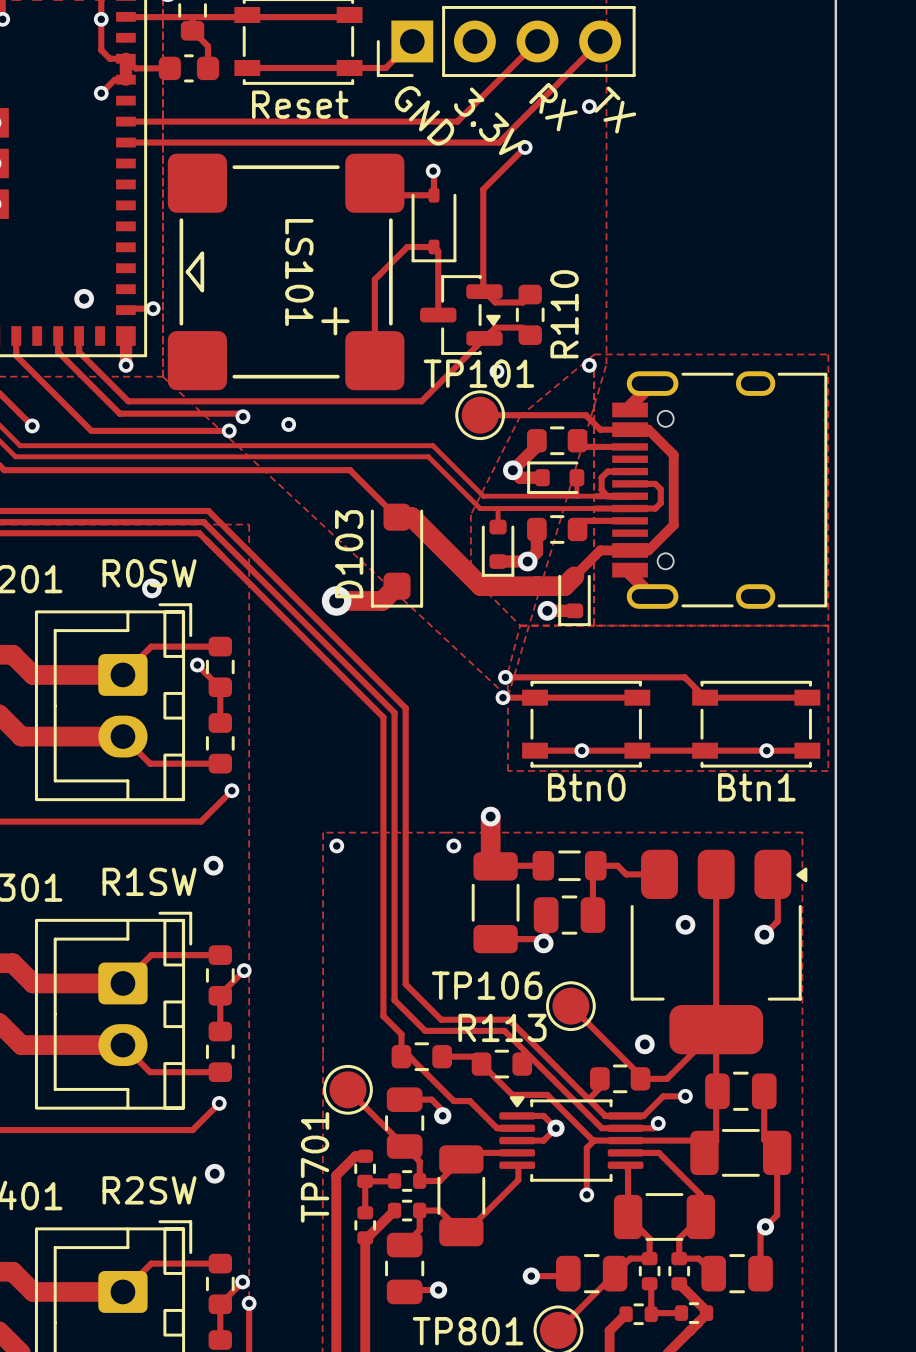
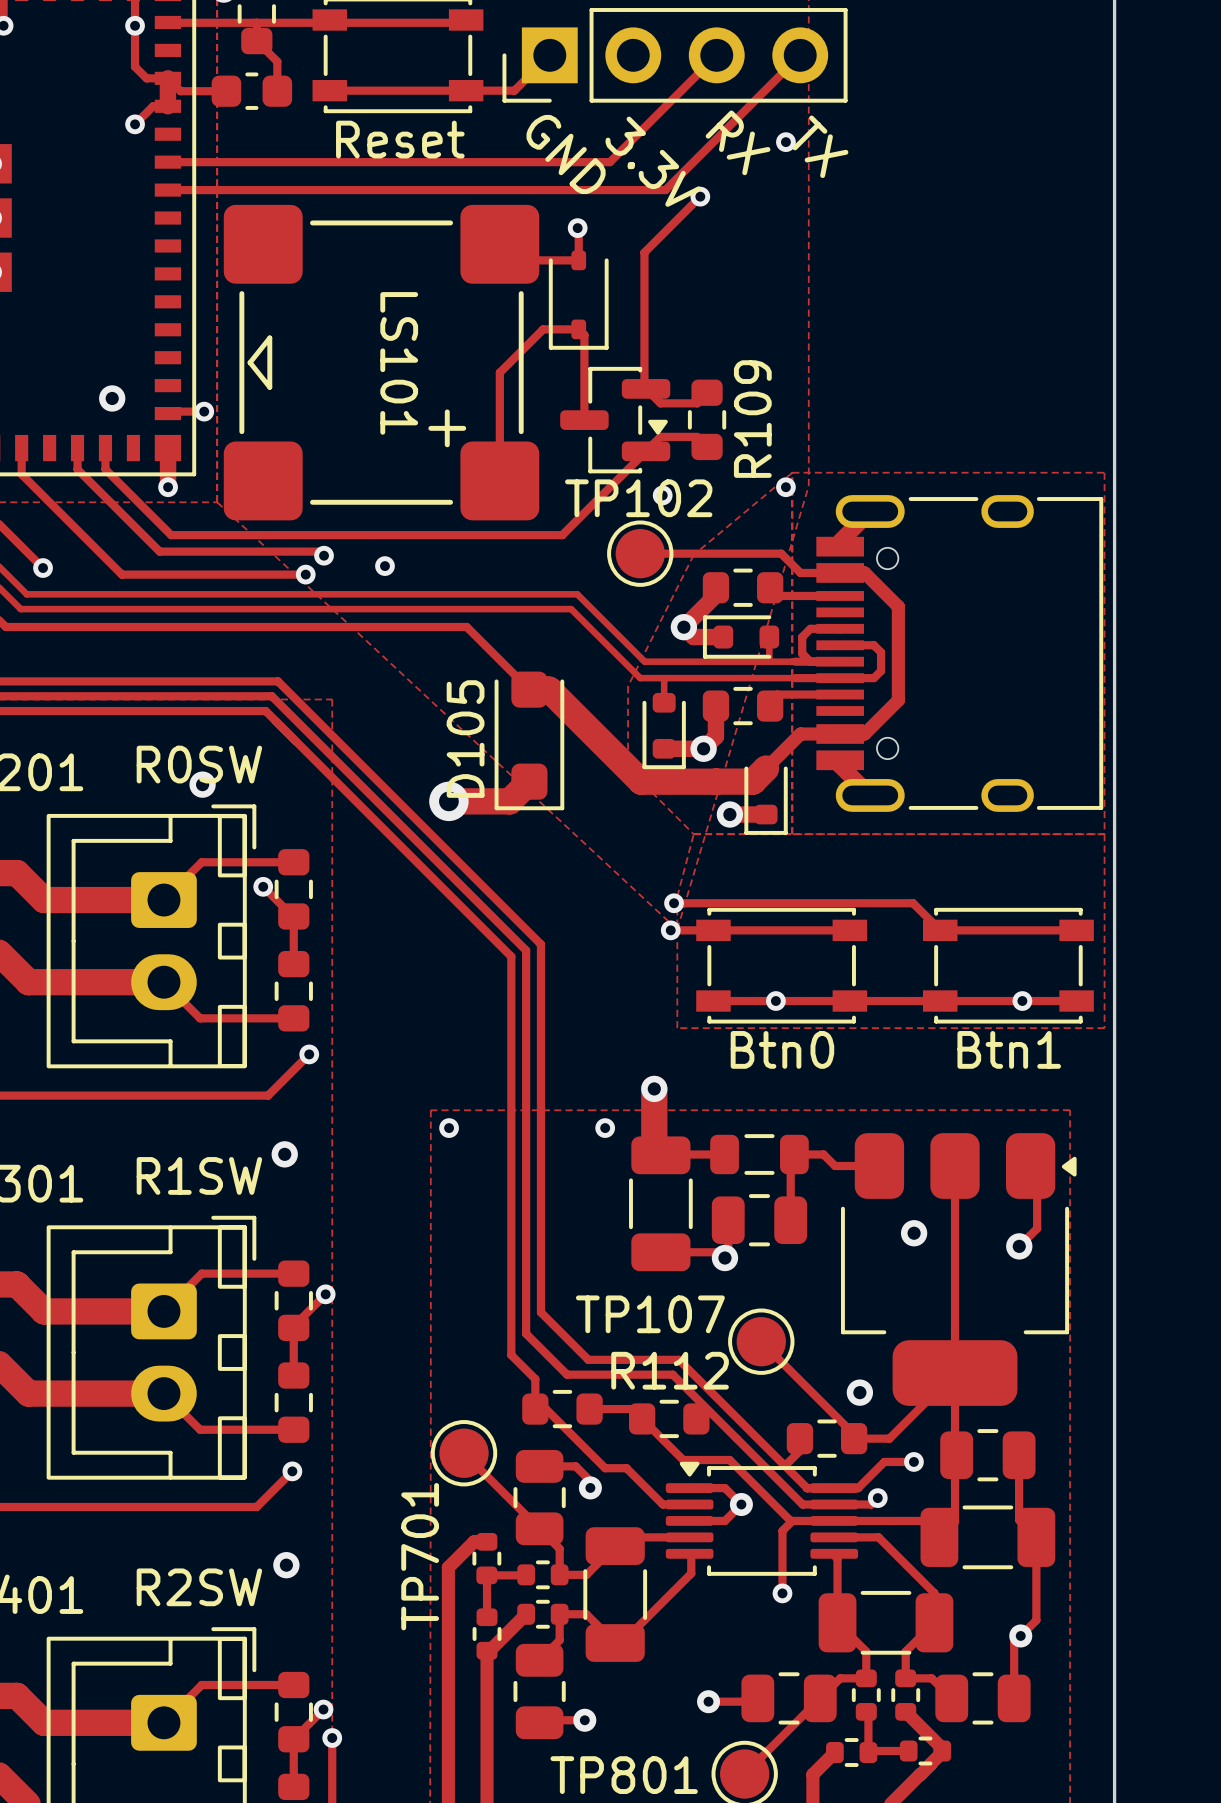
R110 name: R110 (564, 314) -> R109 (752, 419)
TP101 name: TP101 (478, 373) -> TP102 (638, 498)
D103 name: D103 (349, 554) -> D105 (465, 739)
TP106 name: TP106 (487, 985) -> TP107 (650, 1314)
R113 name: R113 (502, 1027) -> R112 (670, 1370)

